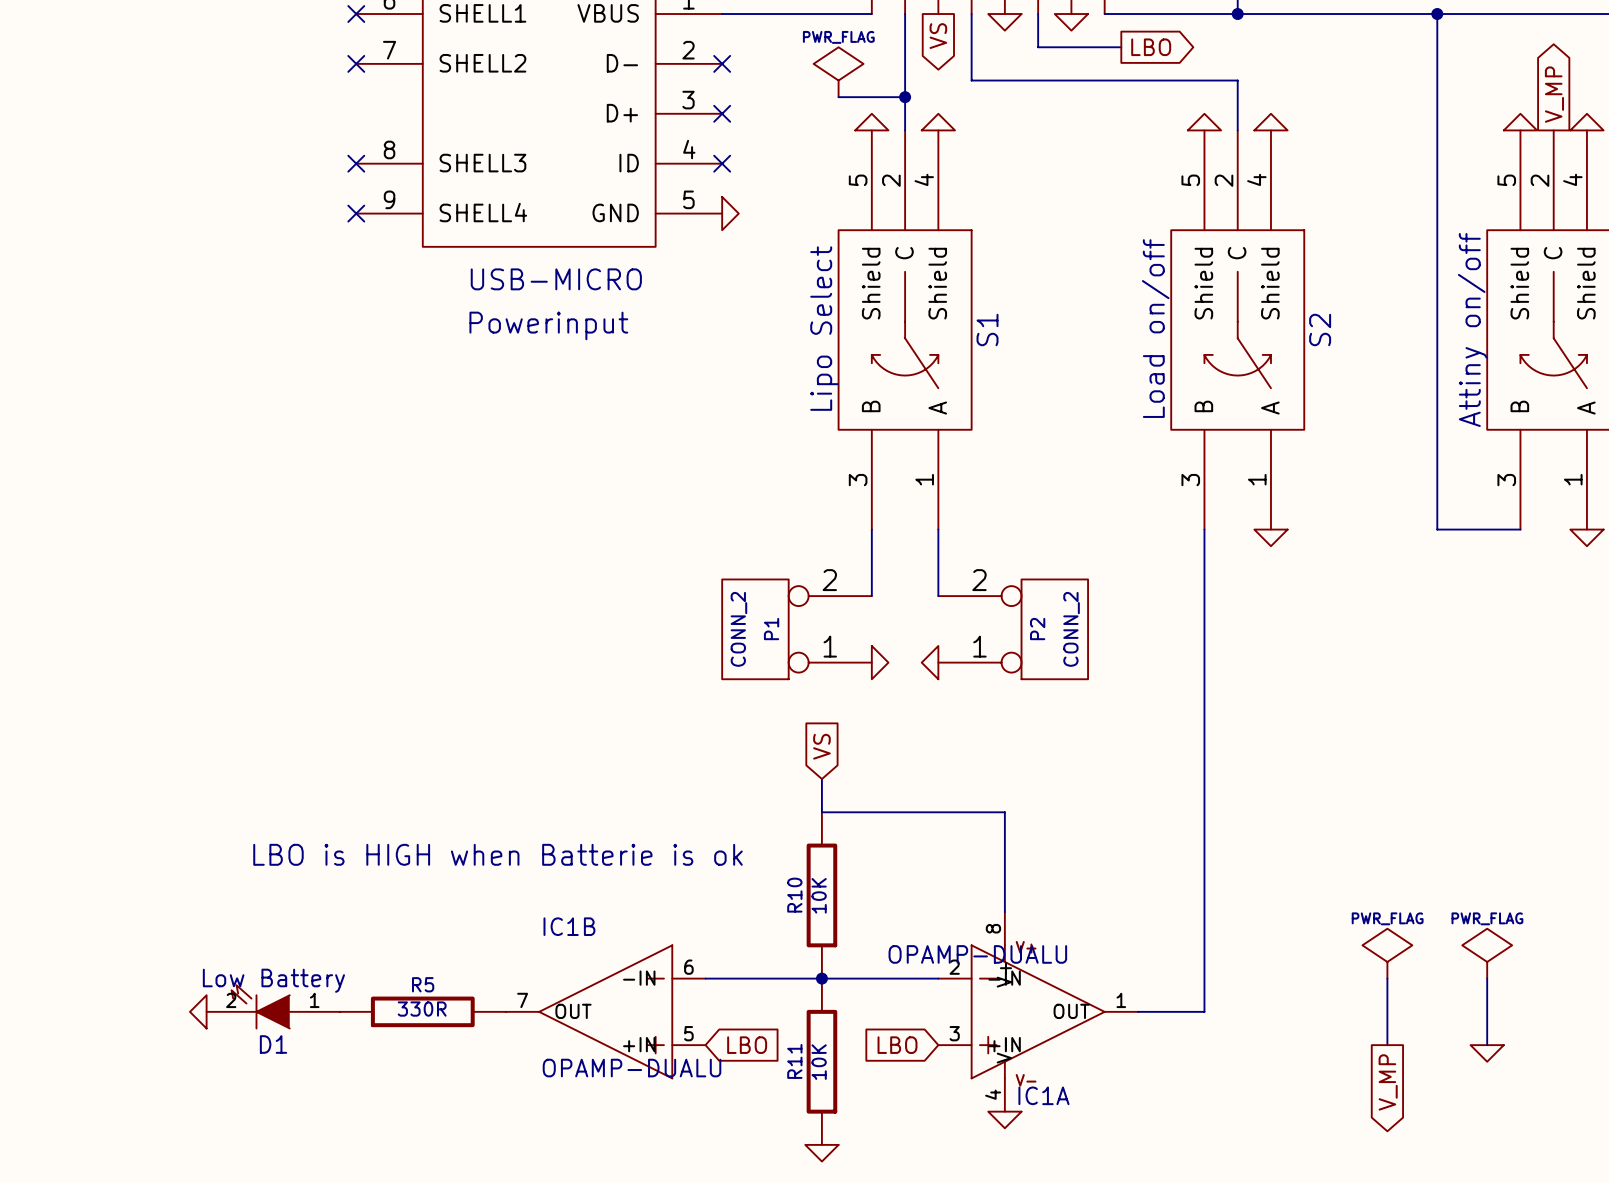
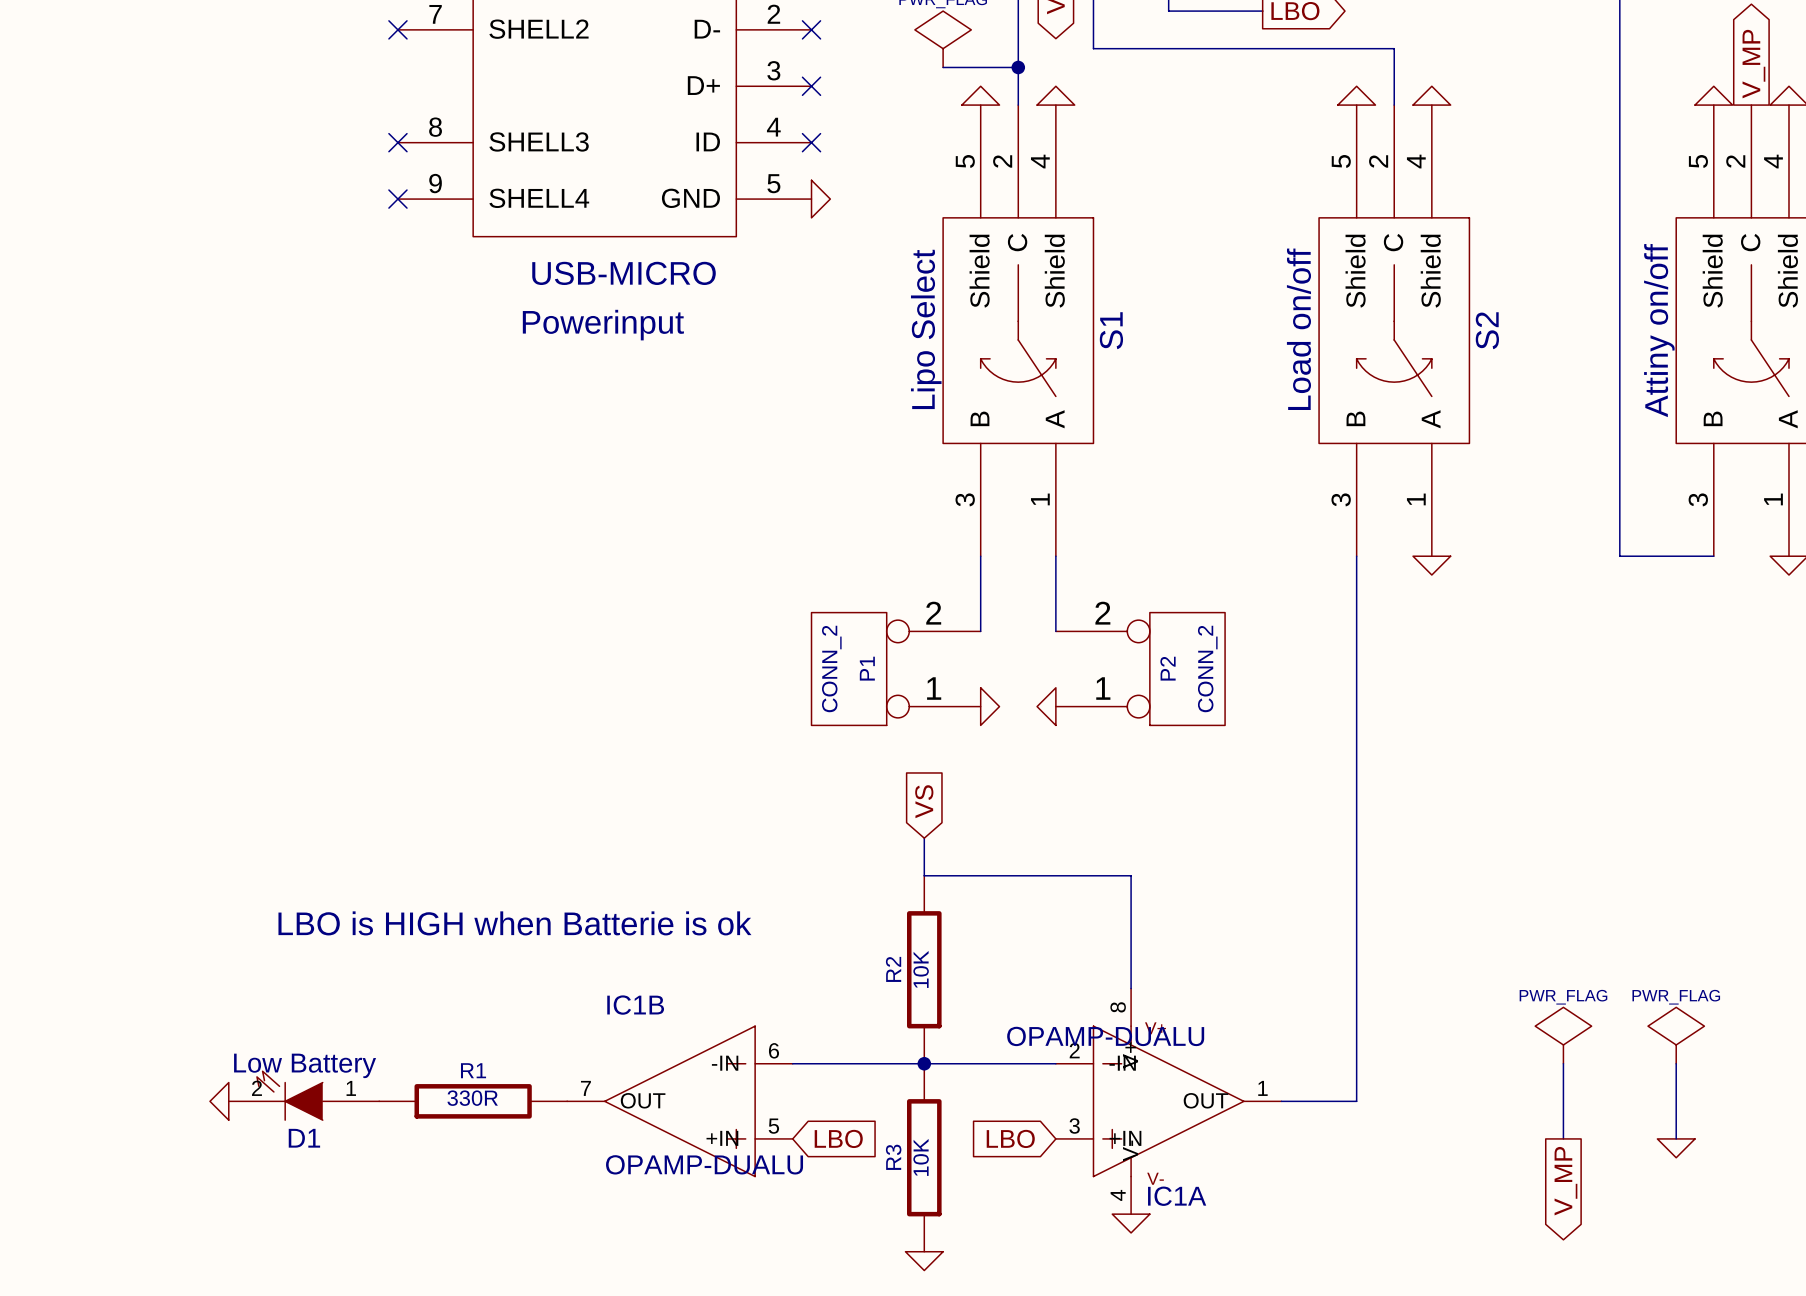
R10 name: R10 (794, 895) -> R2 (893, 969)
R5 name: R5 (423, 984) -> R1 (473, 1070)
R11 name: R11 (794, 1061) -> R3 (893, 1157)

